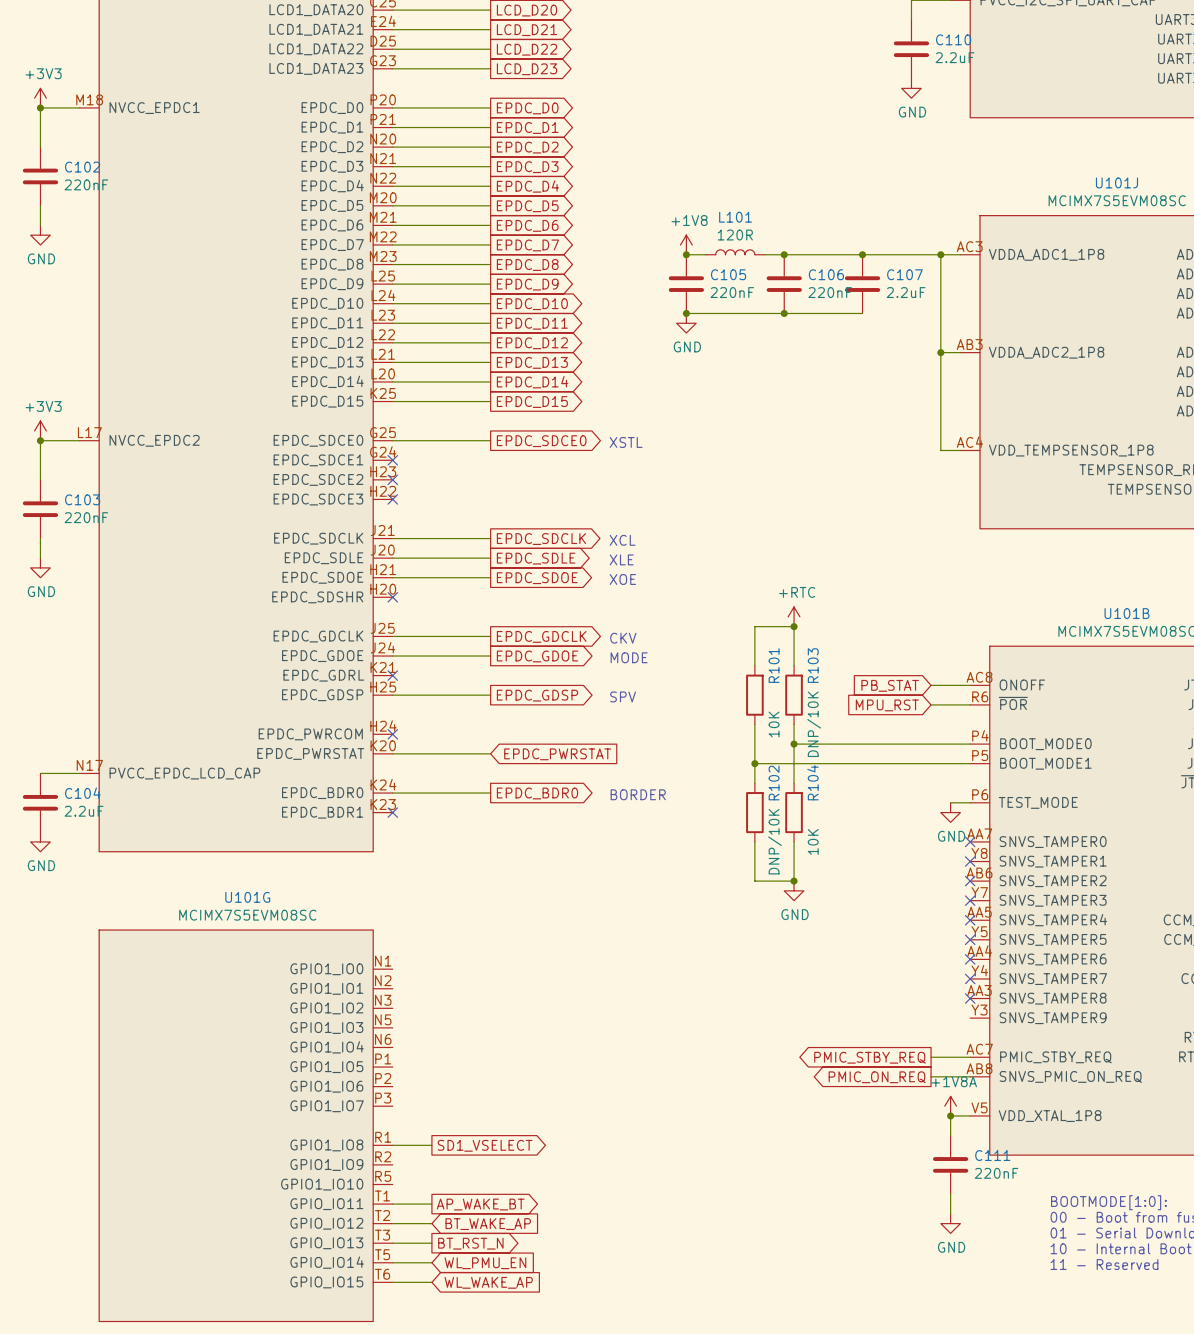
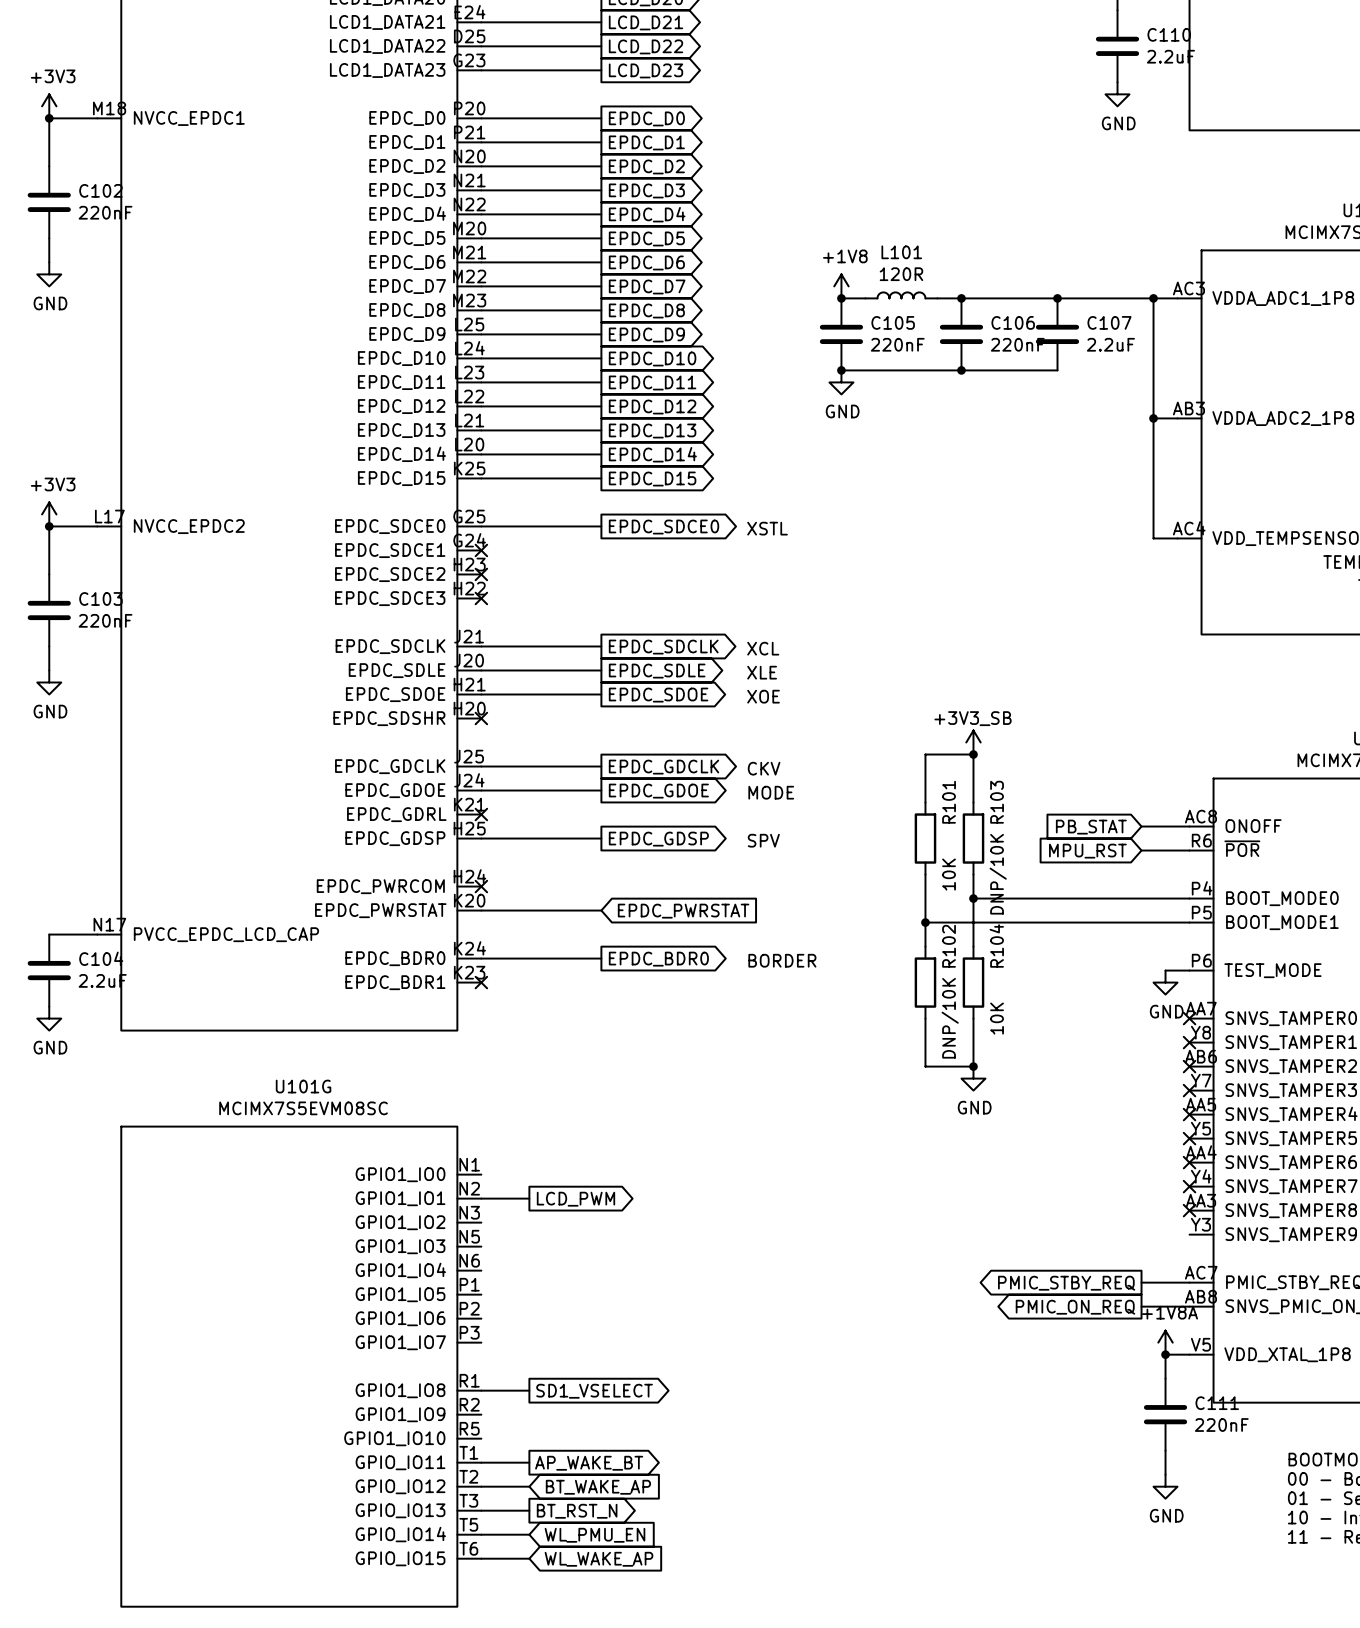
power symbol: +RTC (794, 616) -> +3V3_SB (973, 742)
wire: none -> (481, 1198) (529, 1198)
global label: none -> LCD_PWM (575, 1199)

